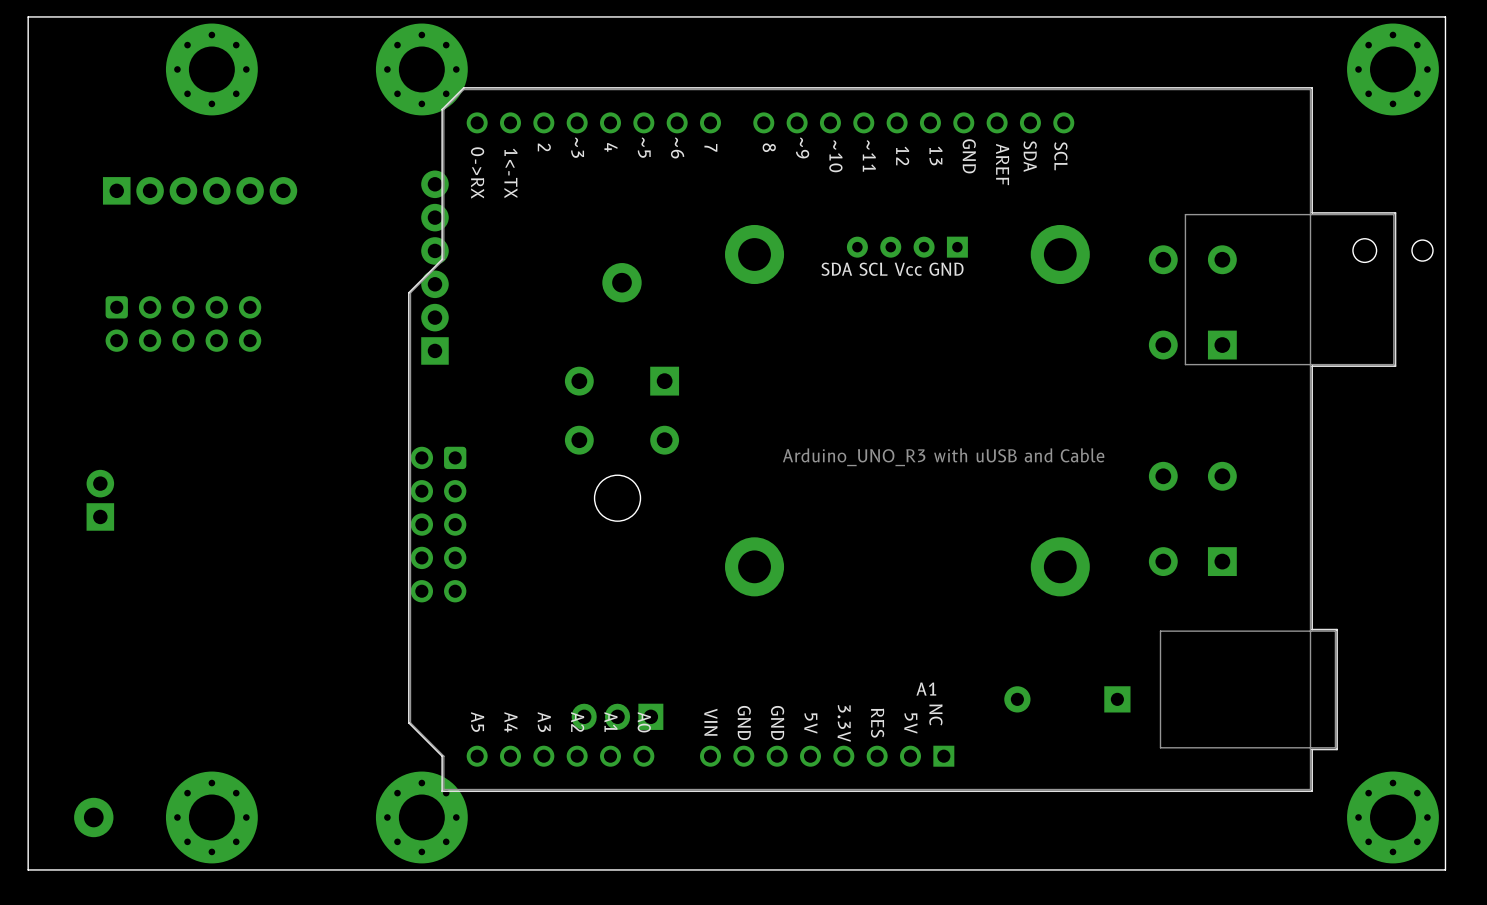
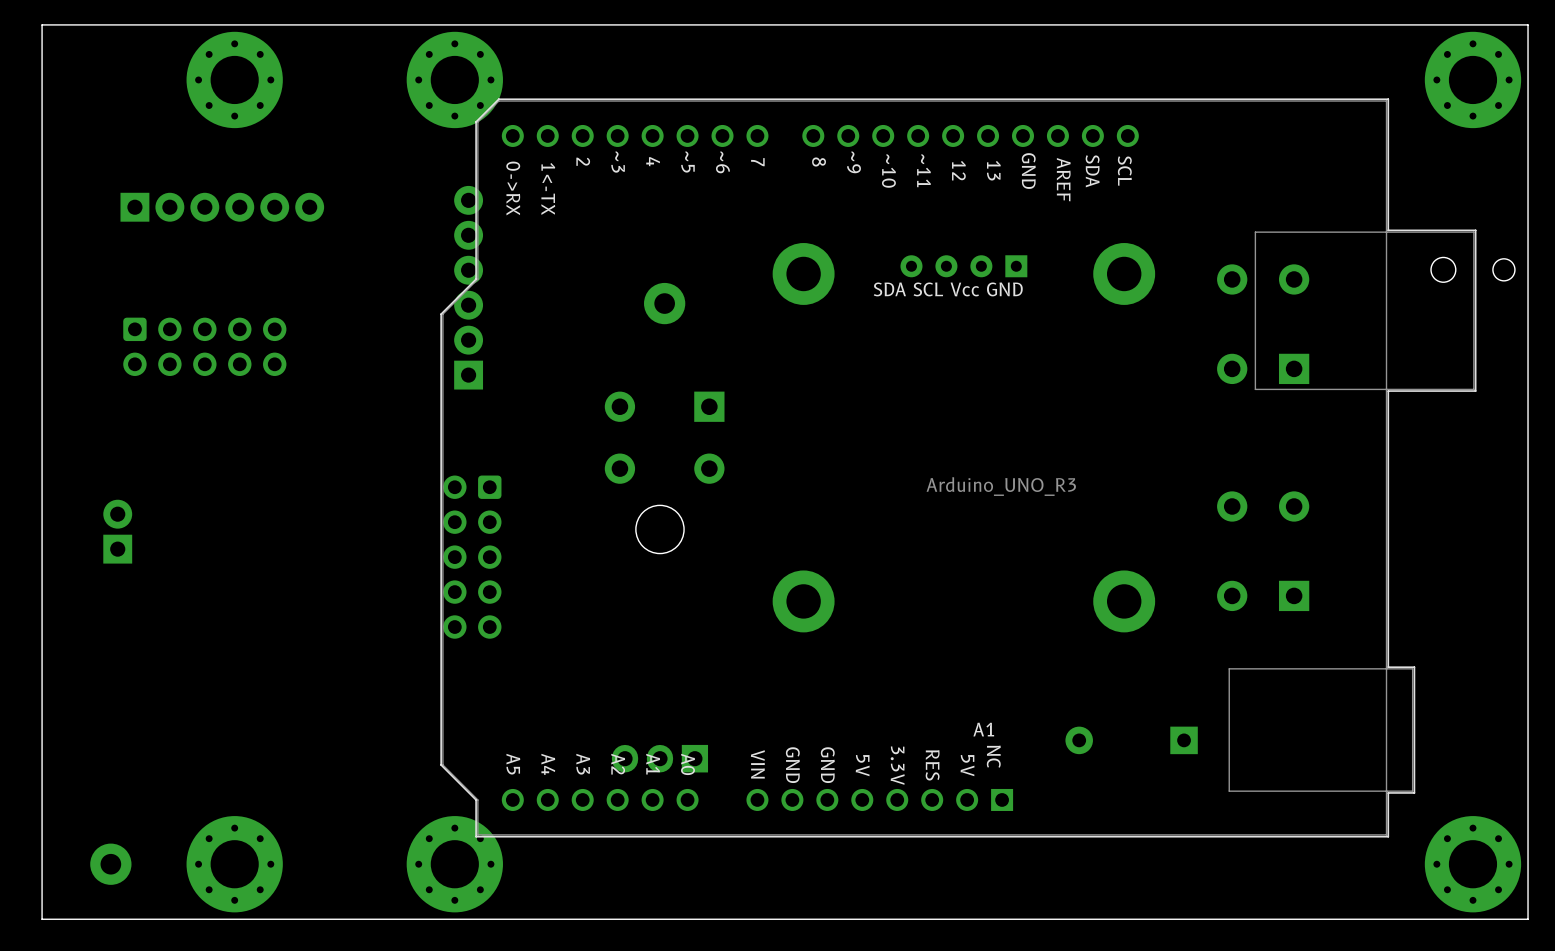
A1 value: Arduino_UNO_R3 with uUSB and Cable (943, 457) -> Arduino_UNO_R3 (1001, 486)

